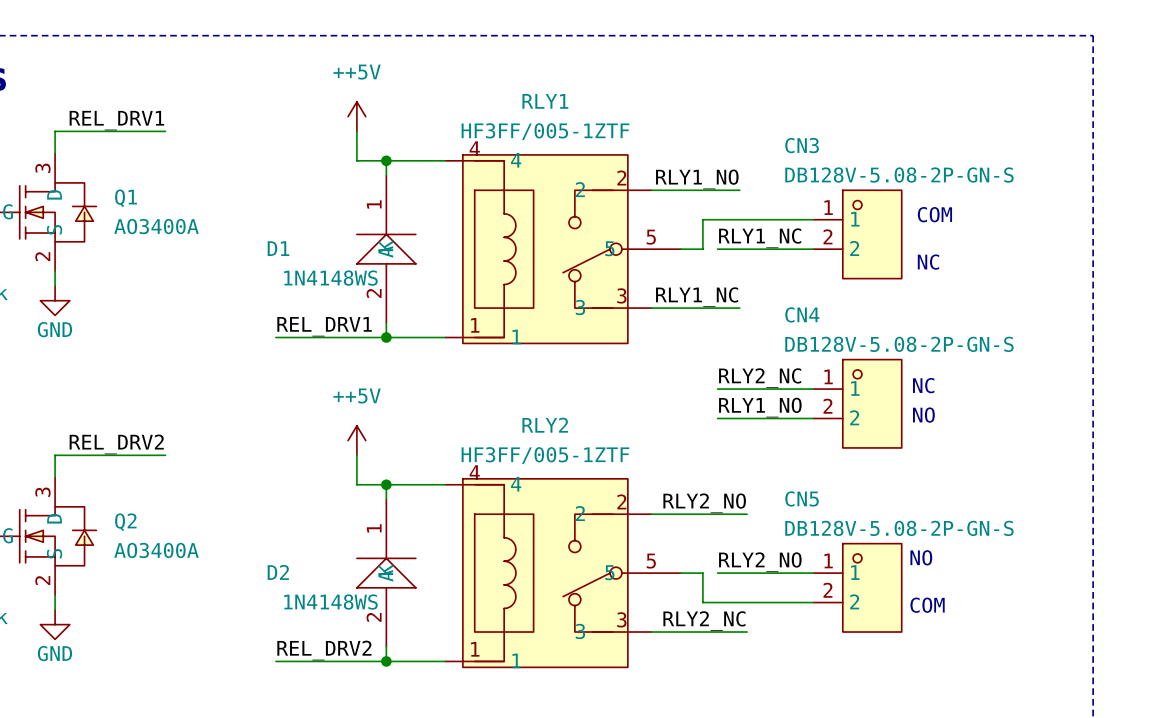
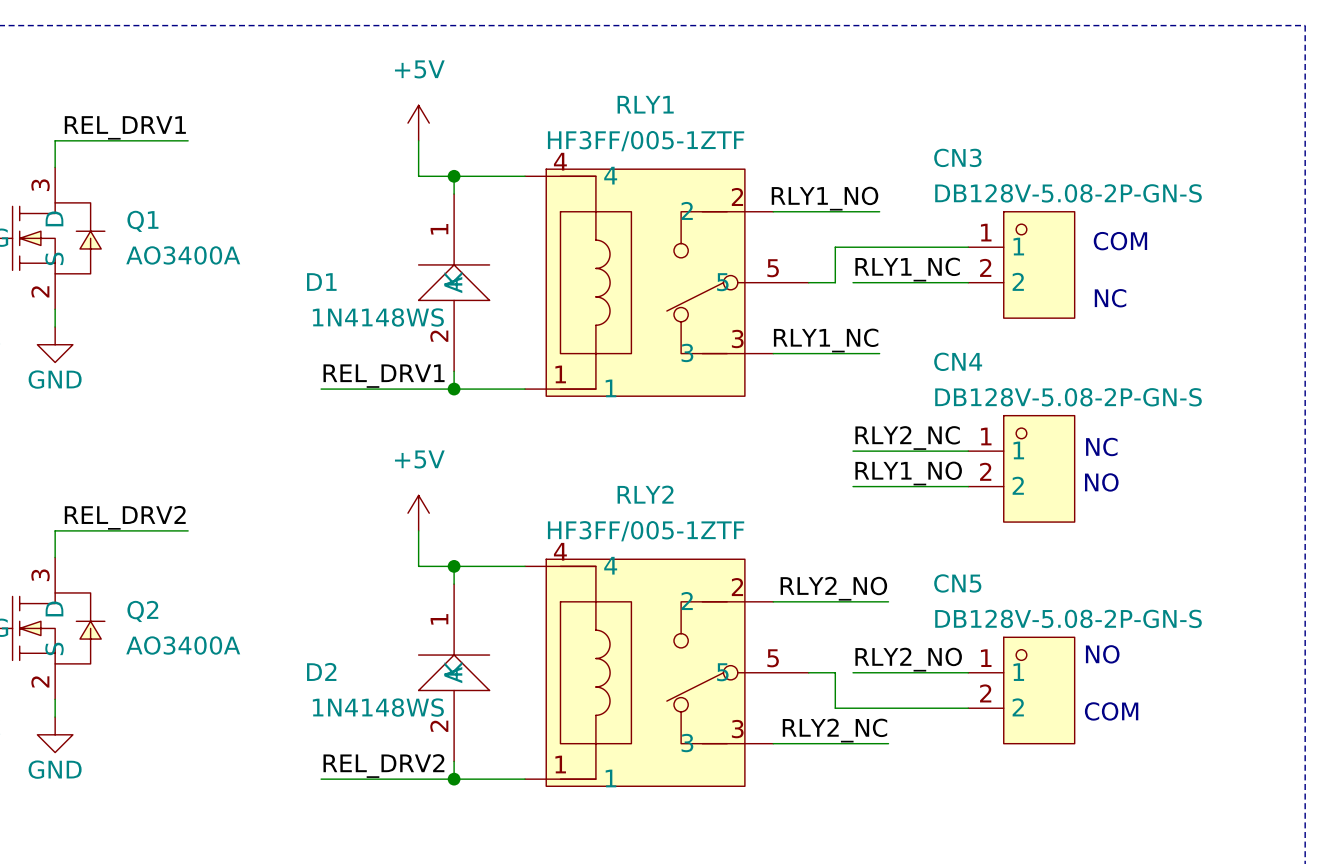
power symbol: ++5V (356, 116) -> +5V (418, 123)
power symbol: ++5V (356, 440) -> +5V (418, 513)

